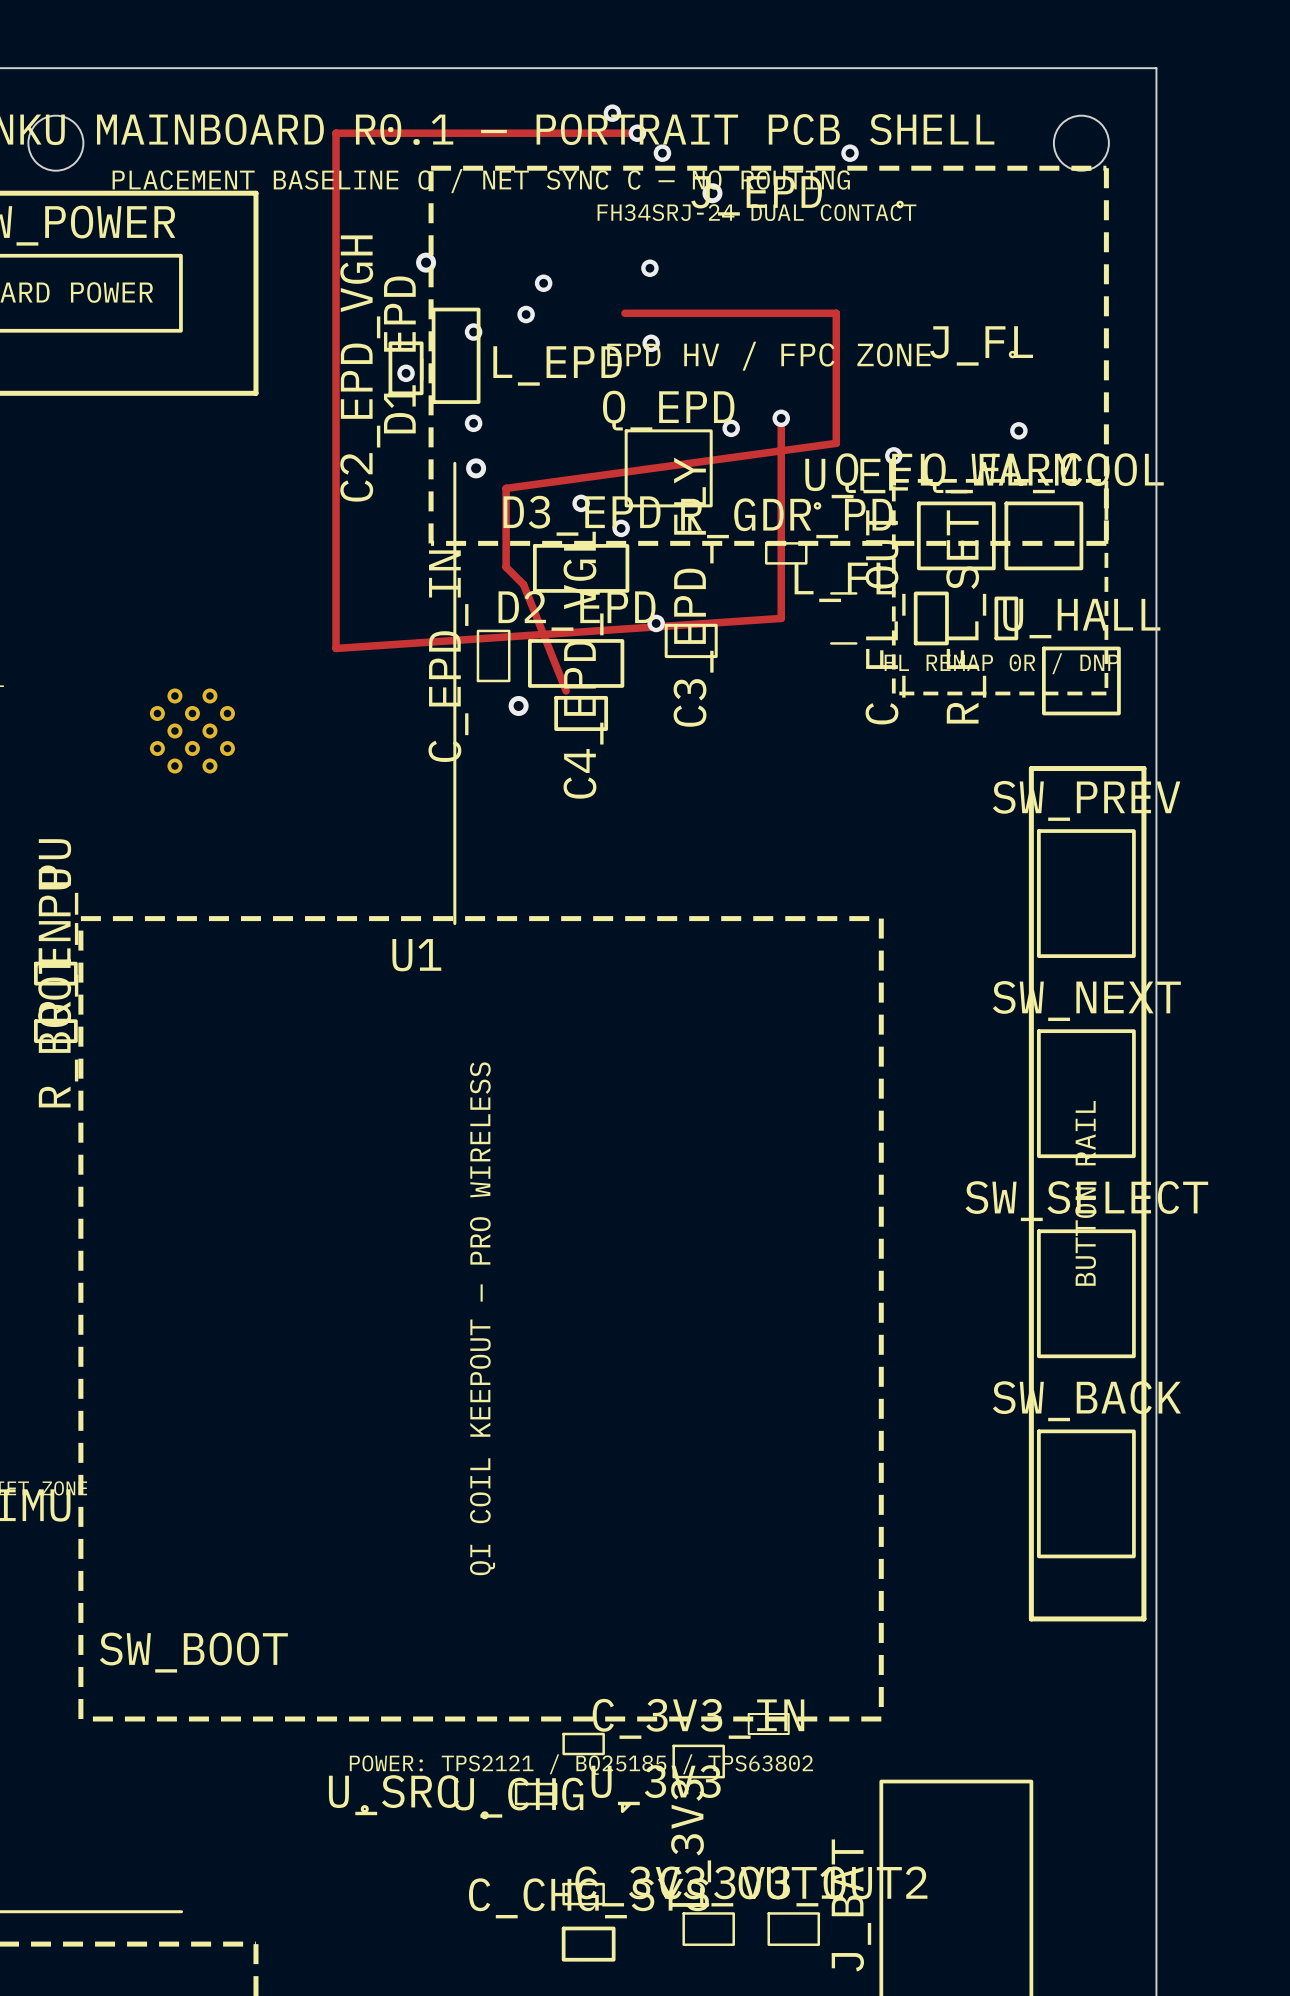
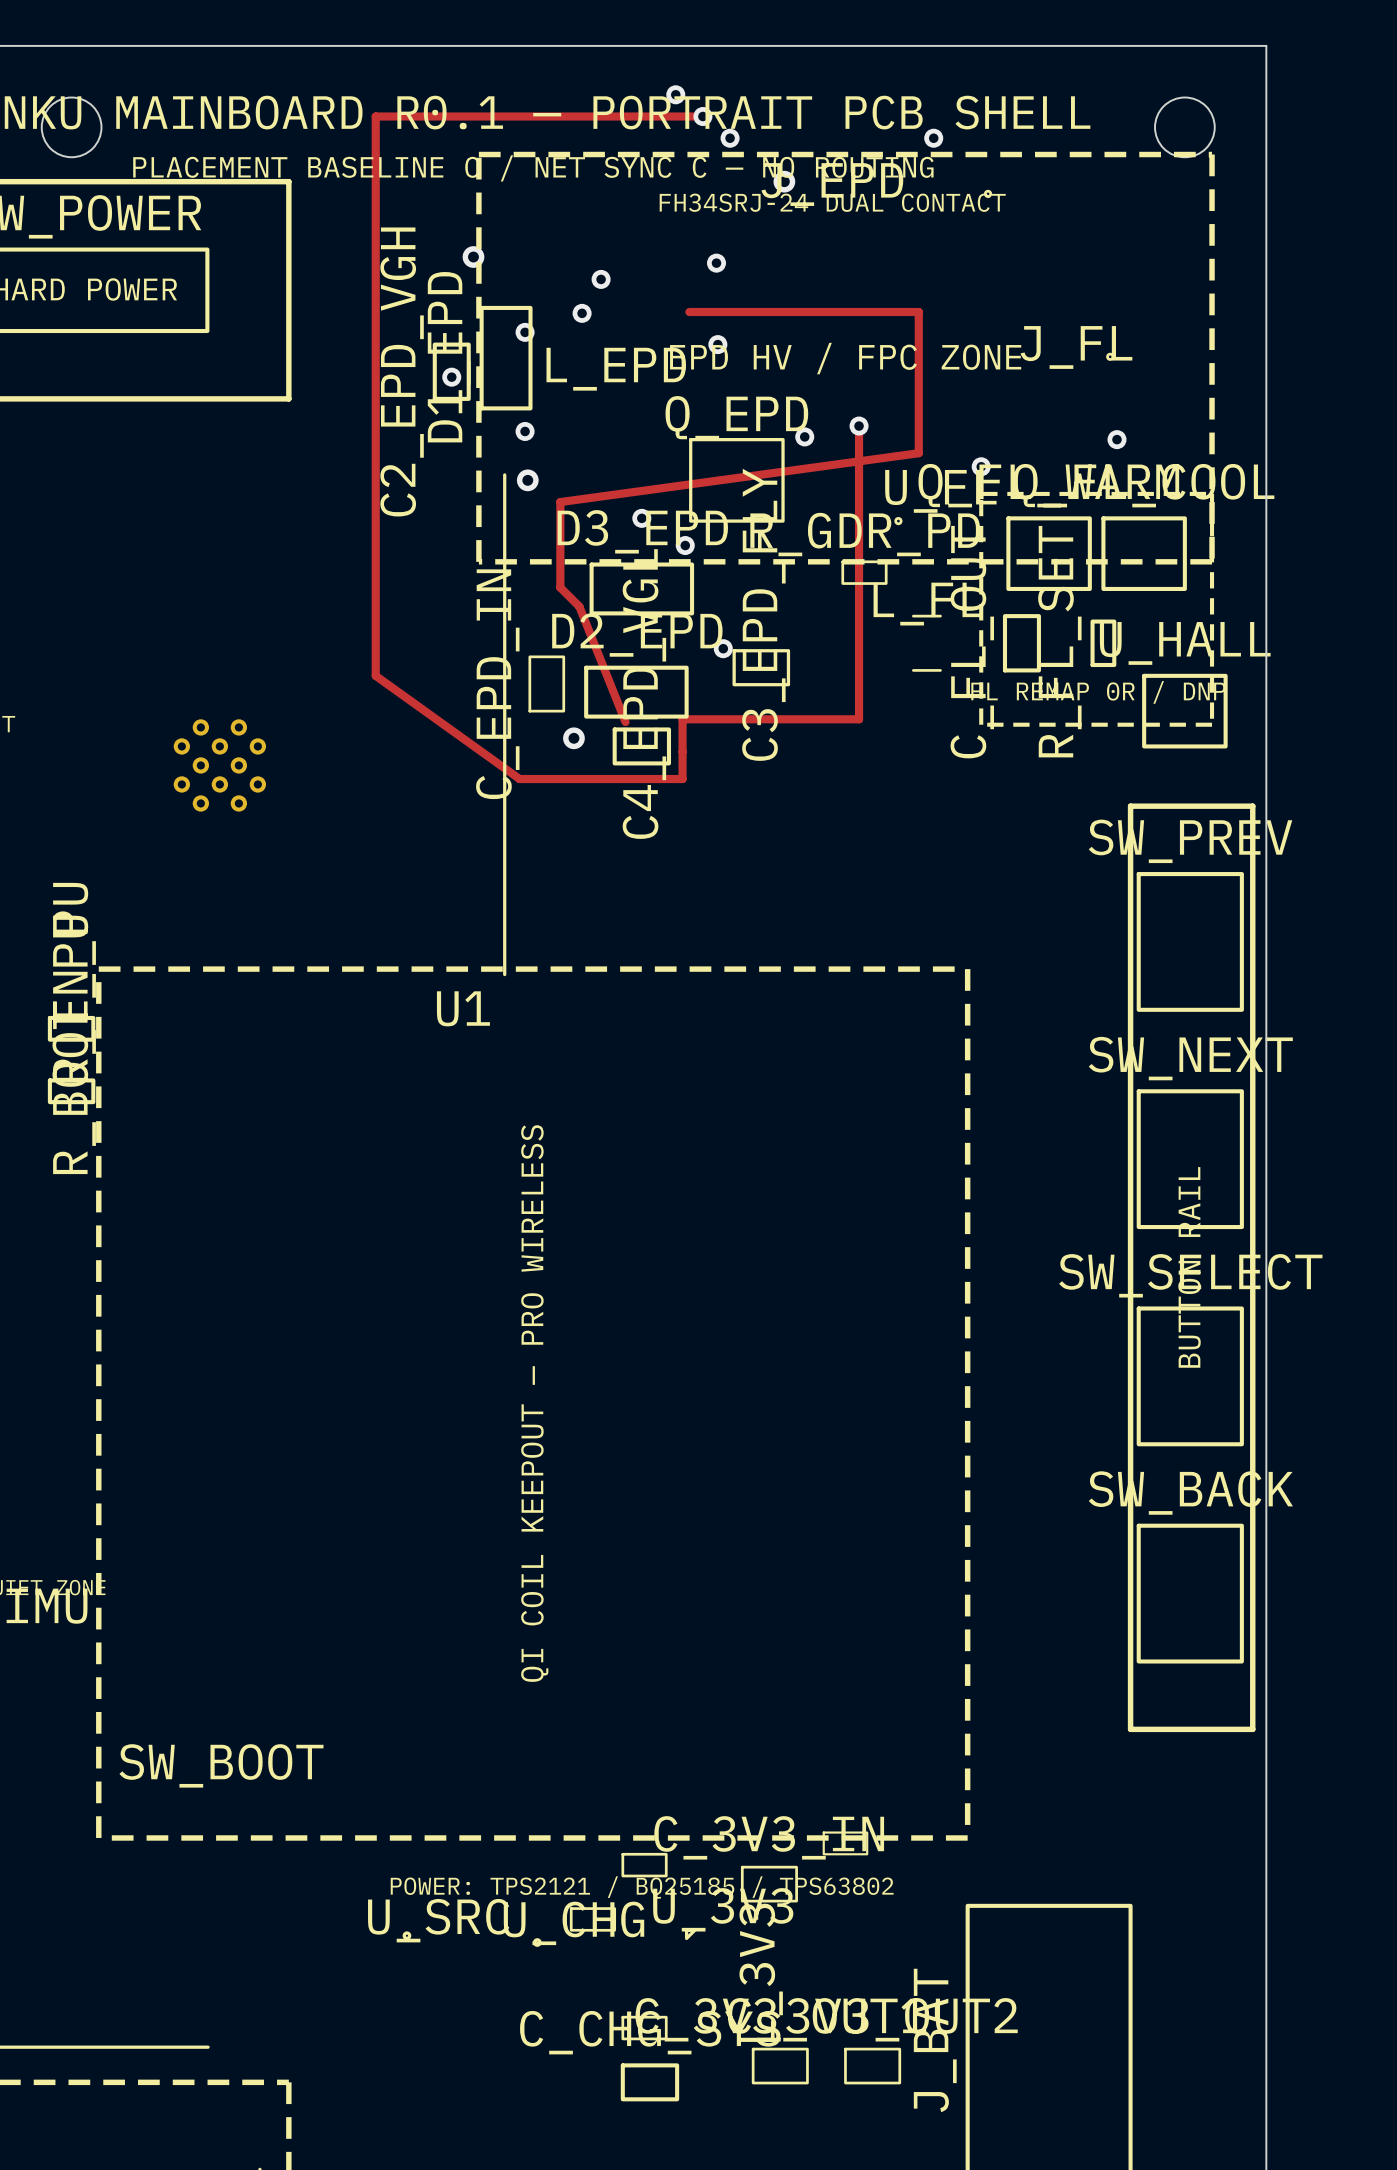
track: (781, 618) (336, 648) -> (859, 643) (859, 719) (682, 719) (682, 779) (519, 779) (375, 675)

